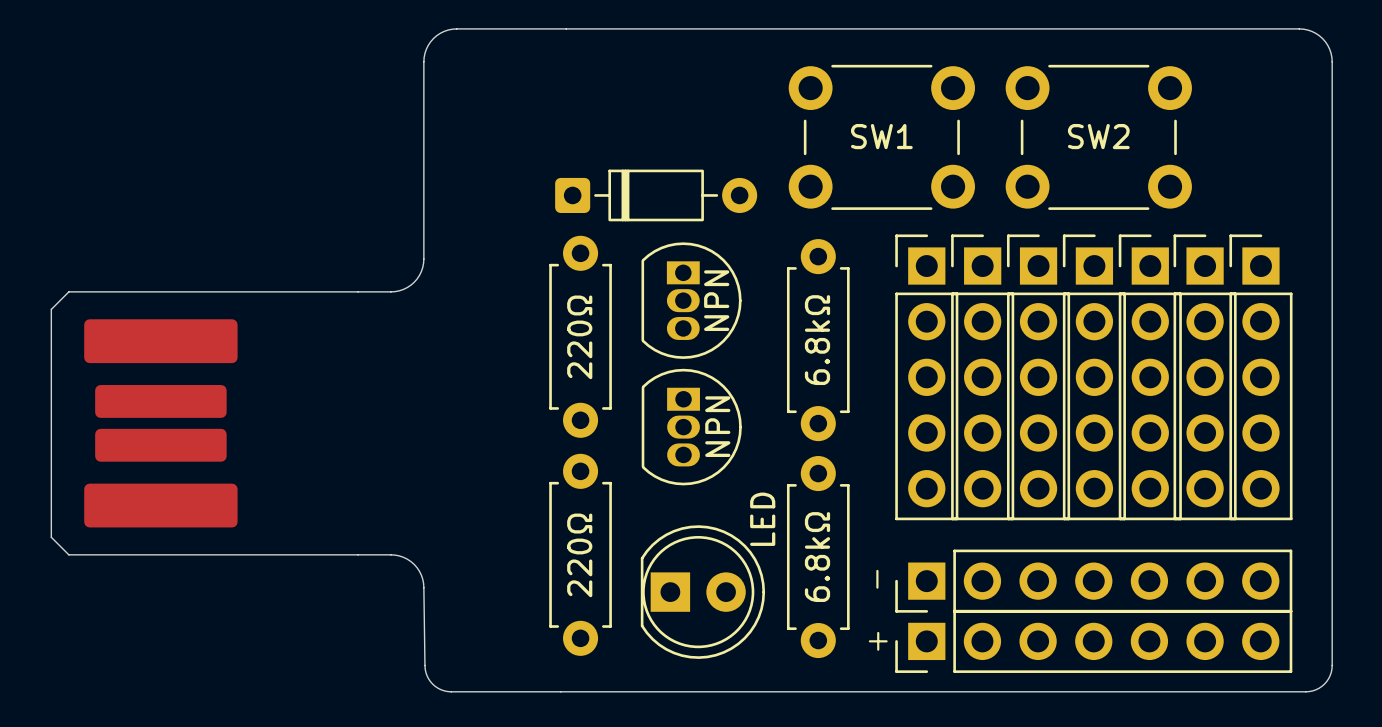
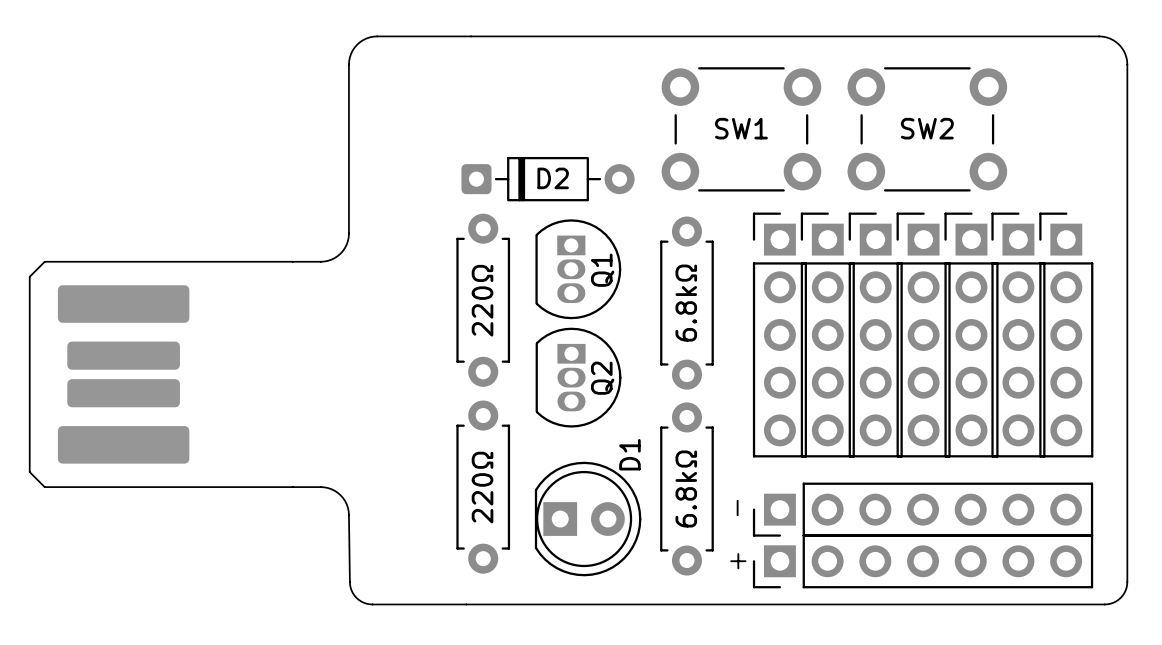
D2 name: none -> D2 (553, 178)
NPN name: NPN (716, 300) -> Q1 (602, 270)
NPN name: NPN (717, 426) -> Q2 (602, 378)
LED name: LED (762, 519) -> D1 (629, 454)

